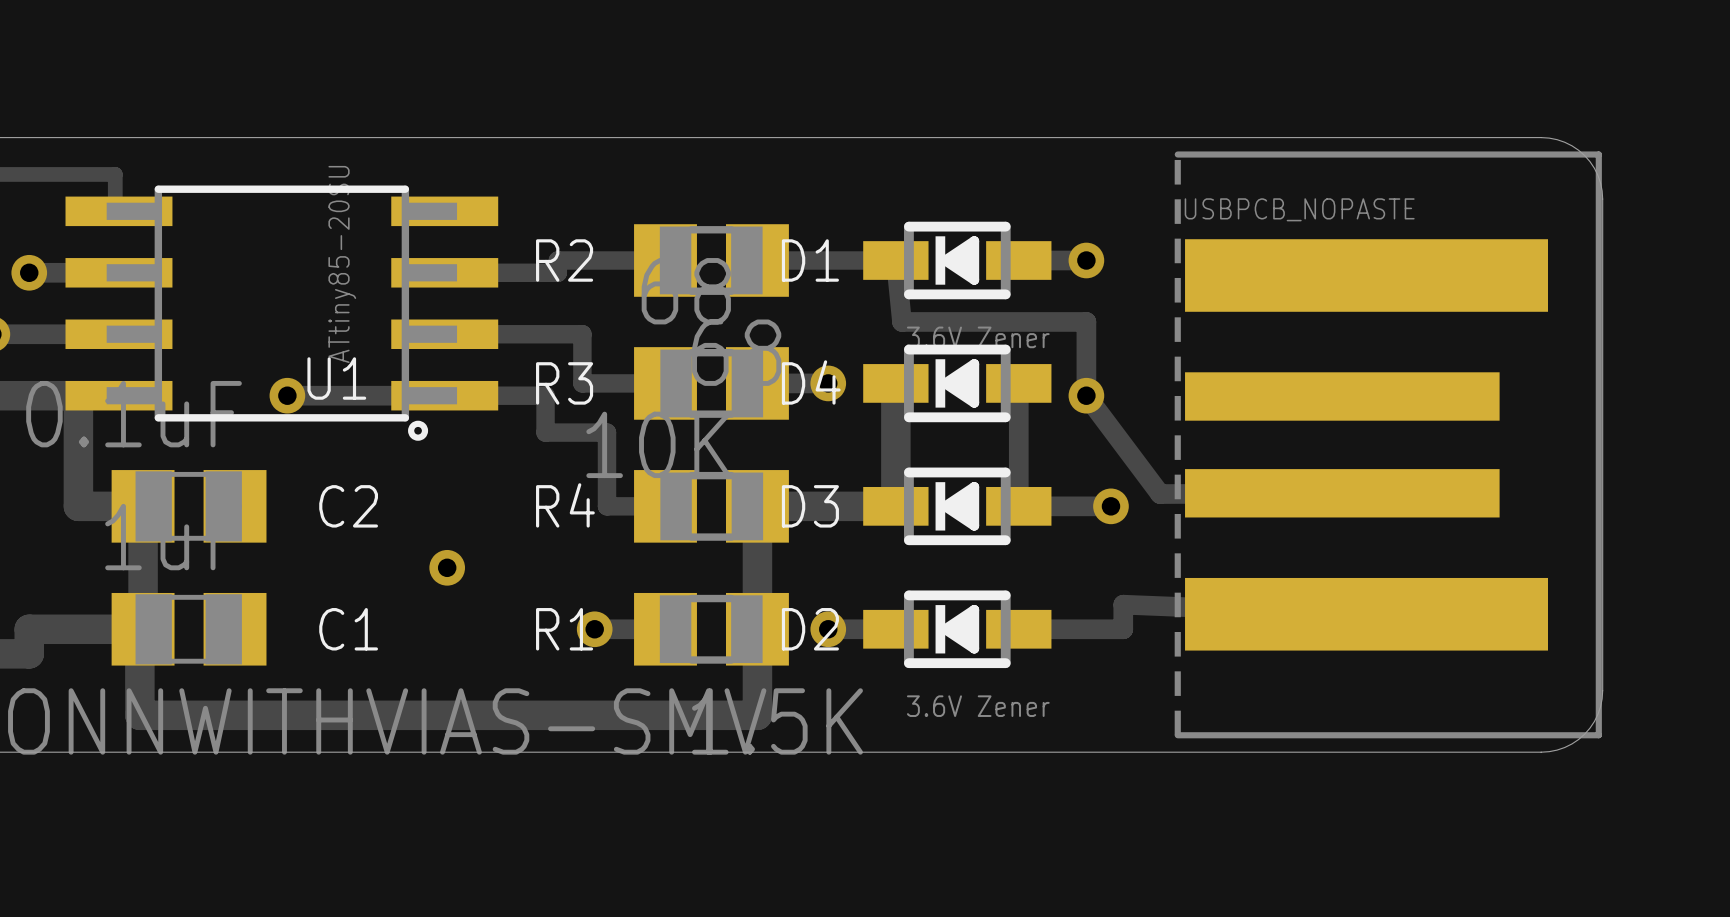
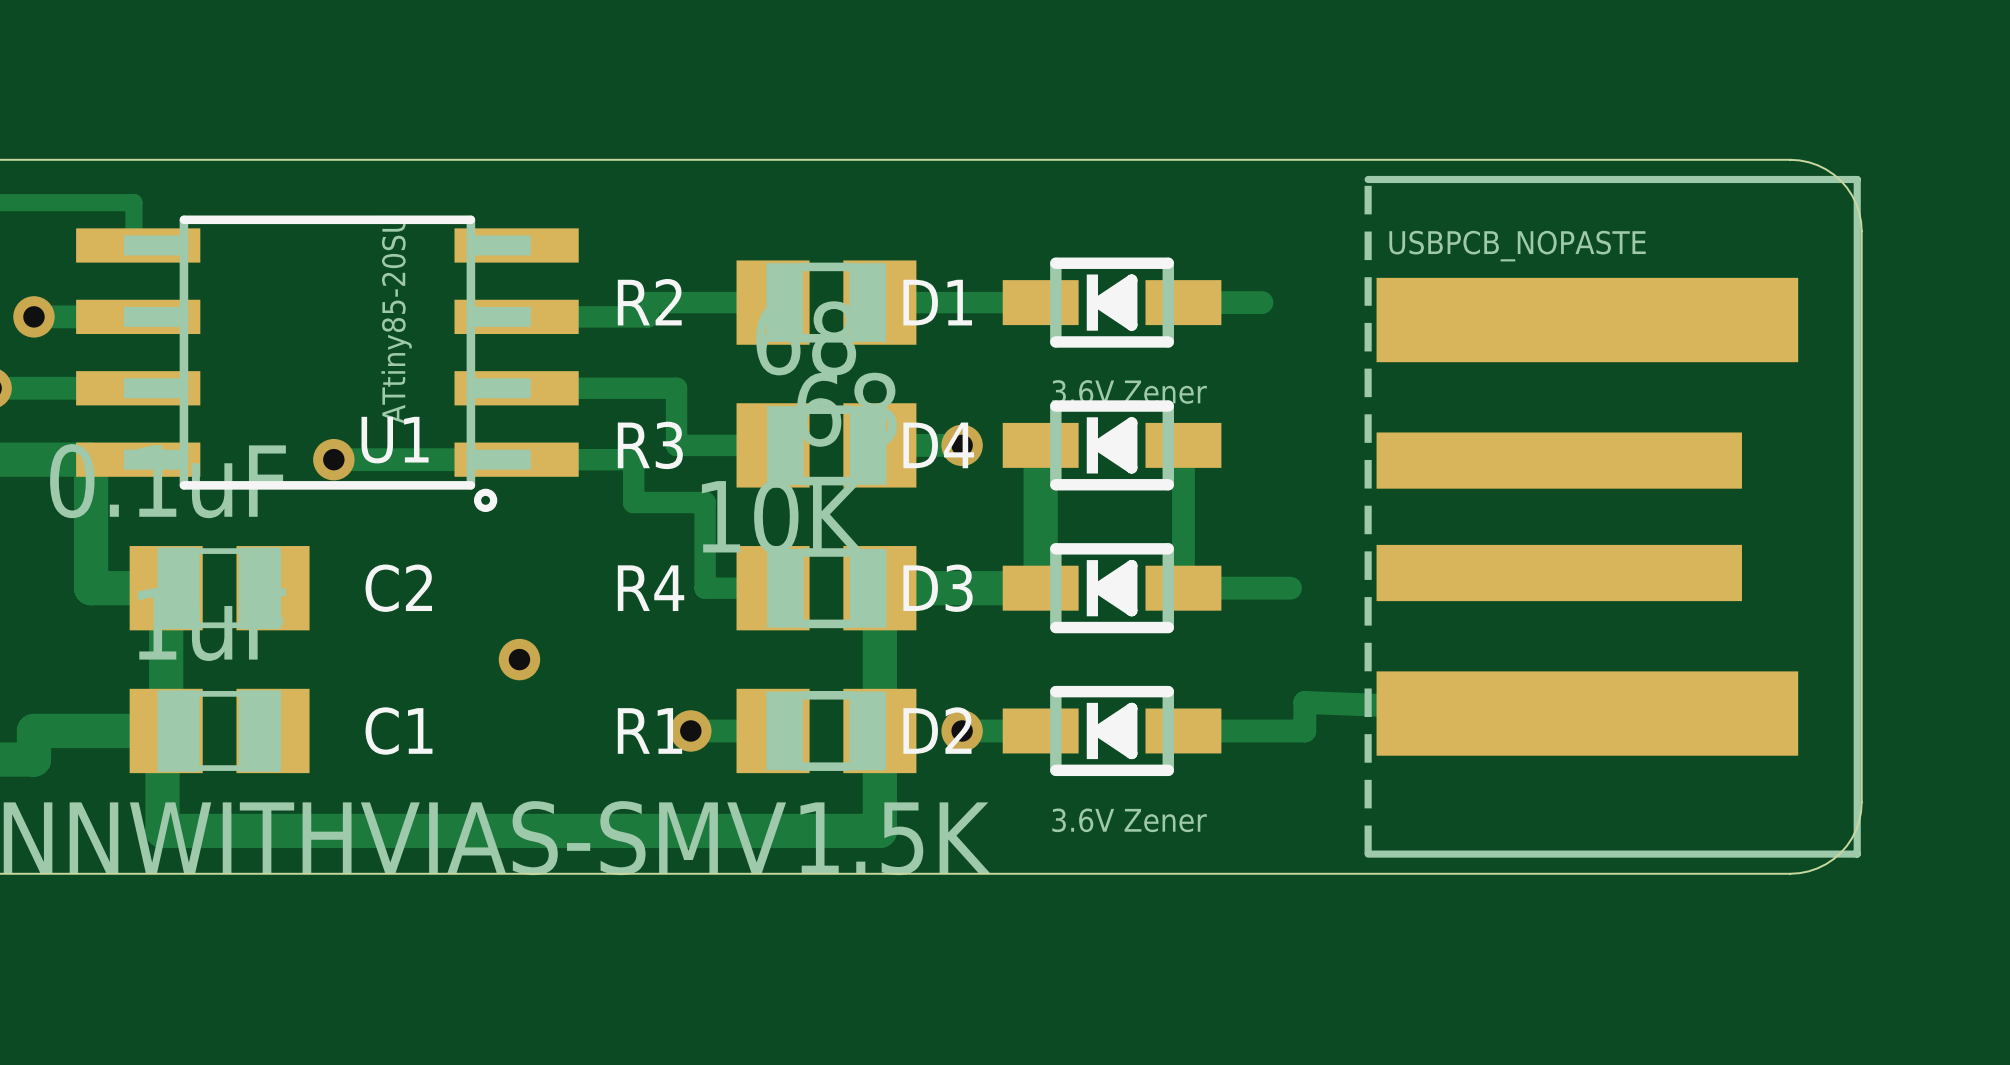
track: (895, 260) (902, 321) (1086, 321) (1086, 395) (1160, 494) (1342, 493) -> none
via: (1086, 260) -> none
via: (1086, 395) -> none
via: (1110, 506) -> none

